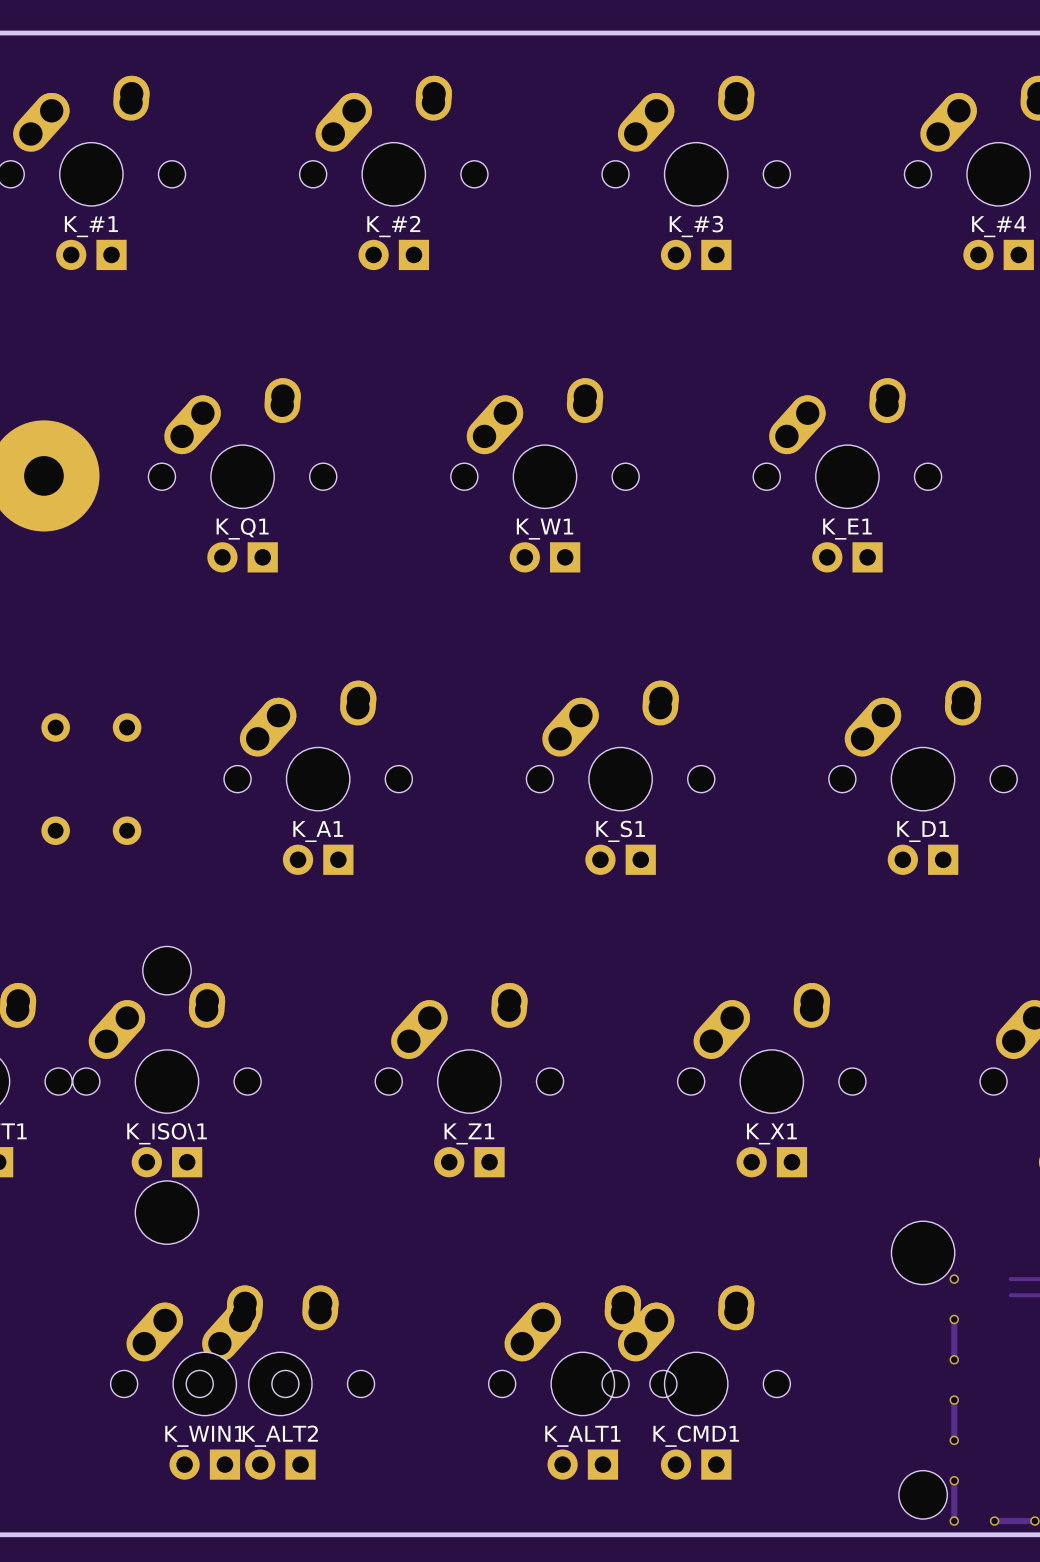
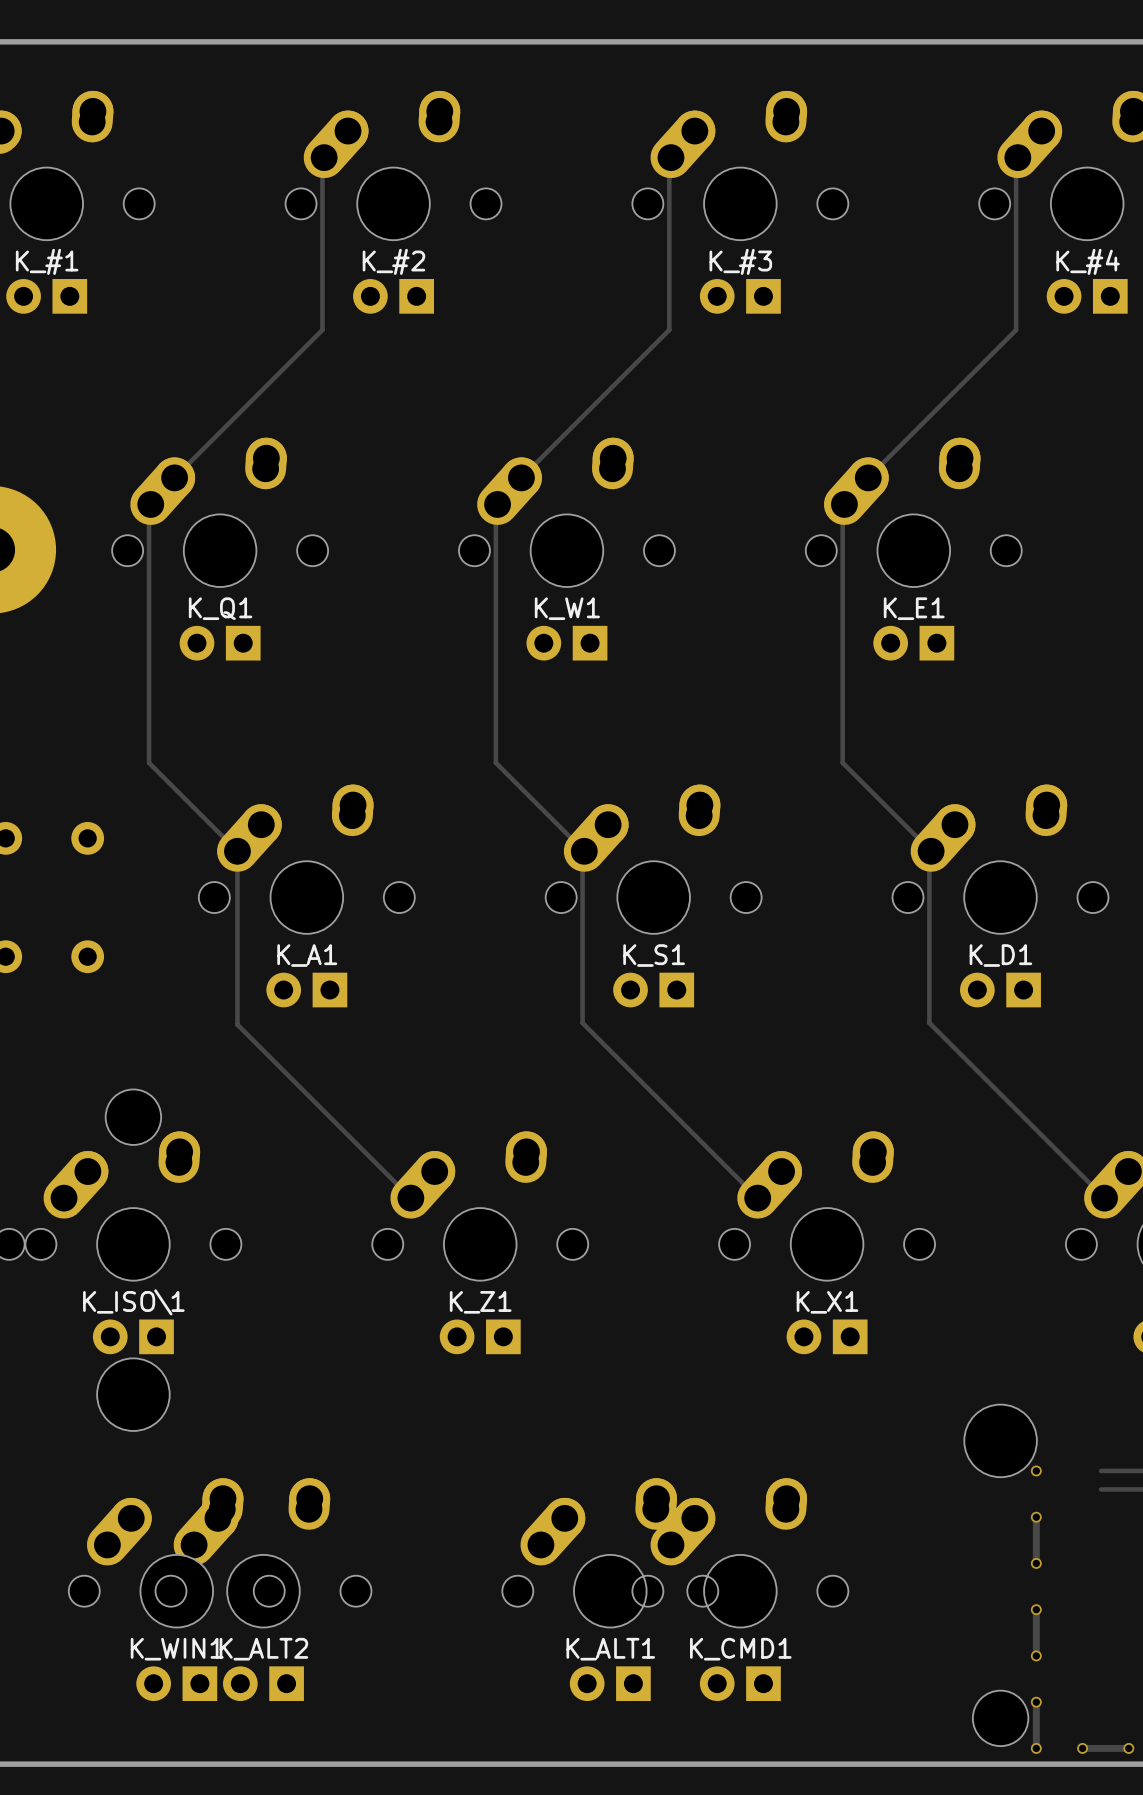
track: none -> (324, 157) (322, 159) (322, 330) (174, 477)
track: none -> (670, 157) (669, 159) (669, 330) (521, 477)
track: none -> (1017, 157) (1016, 159) (1016, 330) (868, 477)
track: none -> (150, 504) (149, 506) (149, 762) (237, 851) (237, 1024) (410, 1198)
track: none -> (497, 504) (495, 506) (495, 762) (584, 851) (582, 853) (582, 1022) (757, 1198)
track: none -> (844, 504) (842, 506) (842, 762) (931, 851) (929, 853) (929, 1022) (1104, 1198)

